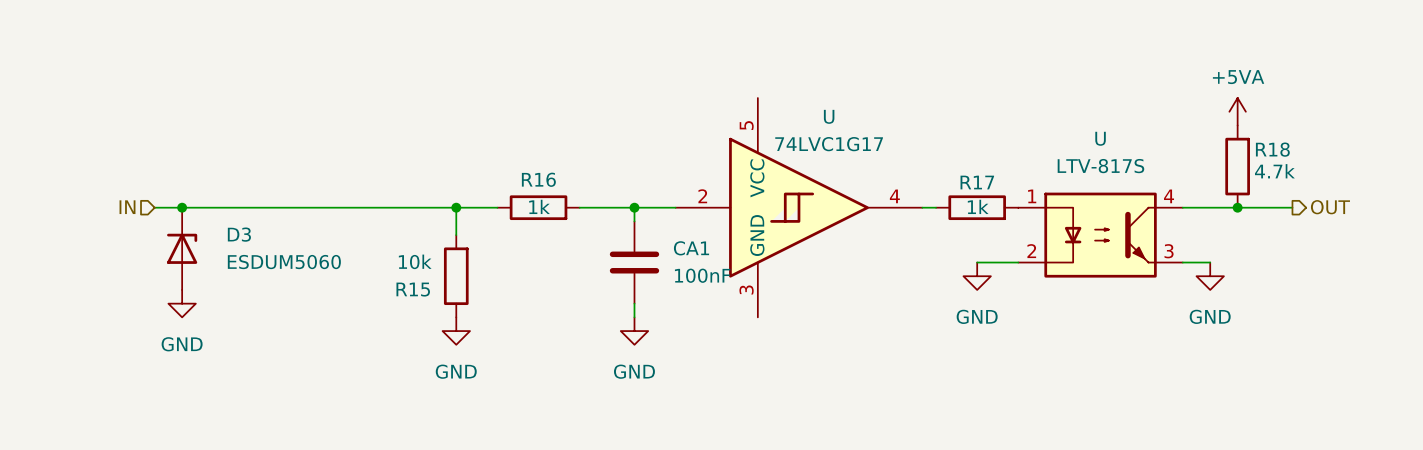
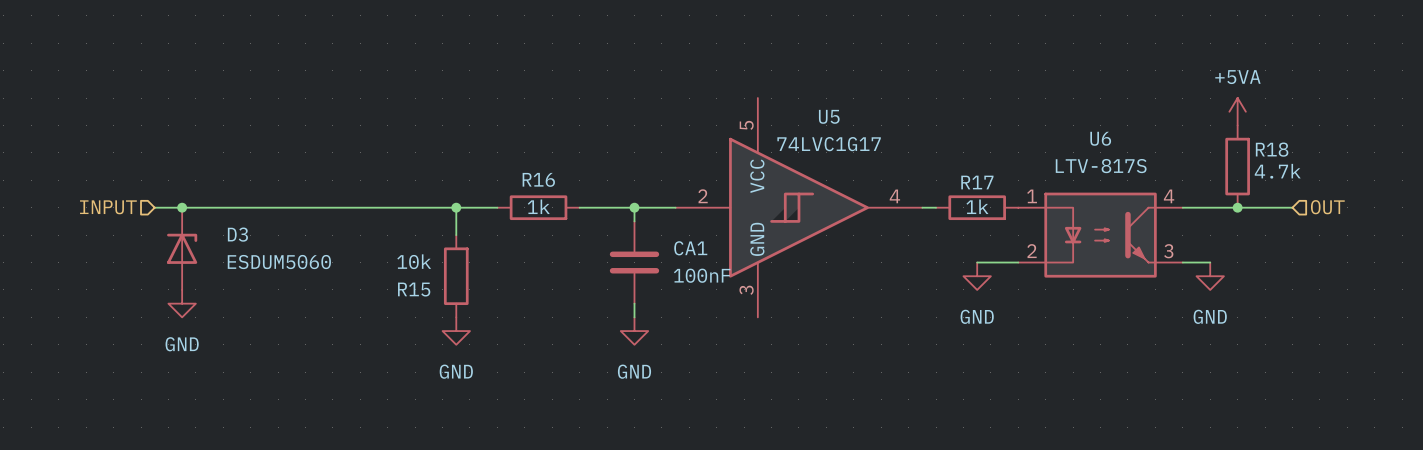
U name: U (829, 116) -> U5 (829, 116)
U name: U (1100, 138) -> U6 (1100, 138)
hierarchical label: IN (127, 207) -> INPUT (108, 207)
hierarchical label shape: output (1330, 207) -> input (1327, 207)

